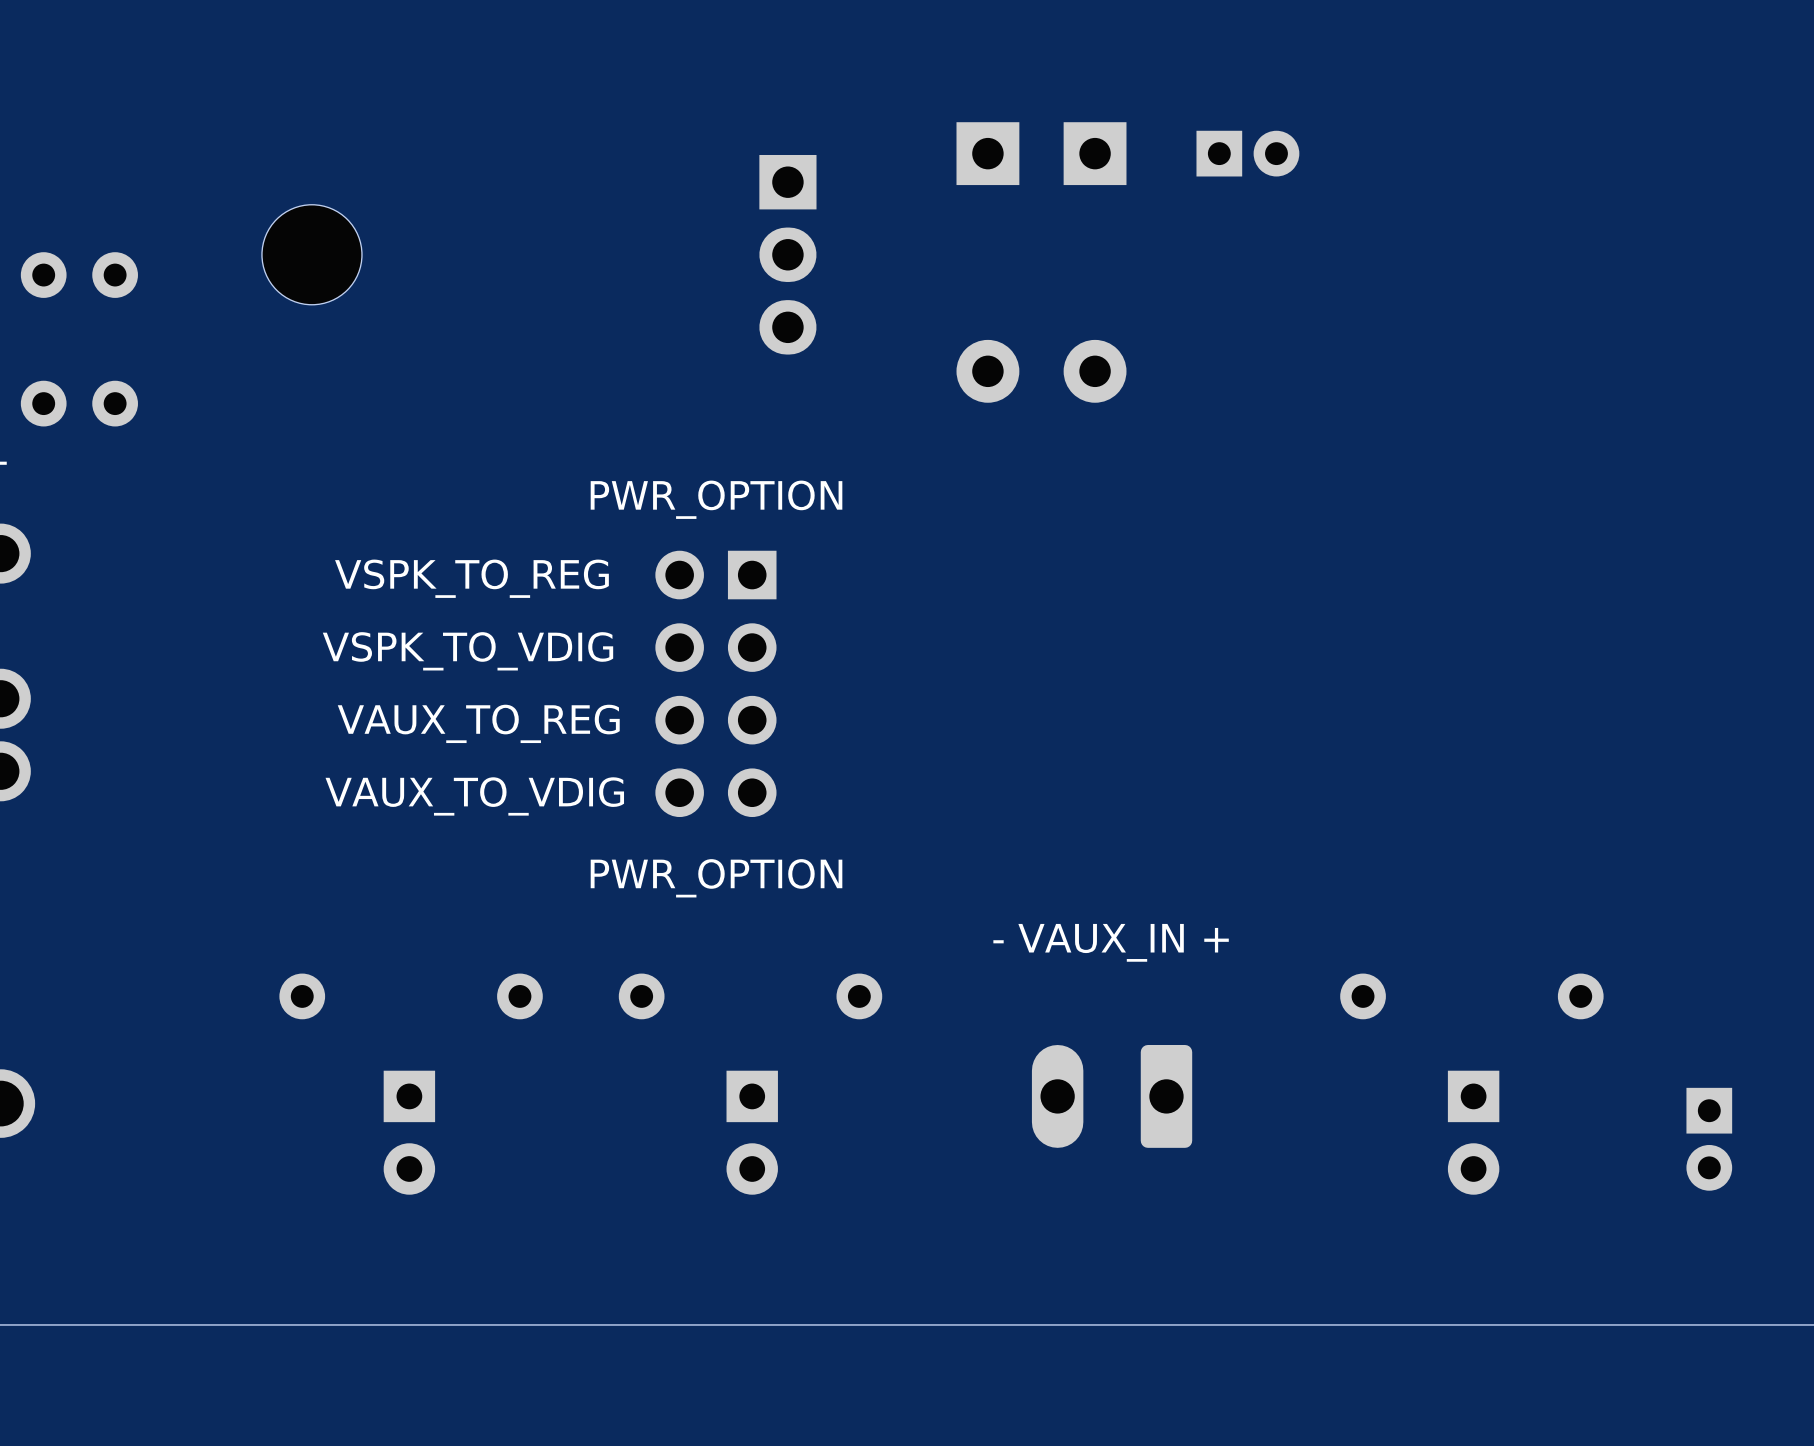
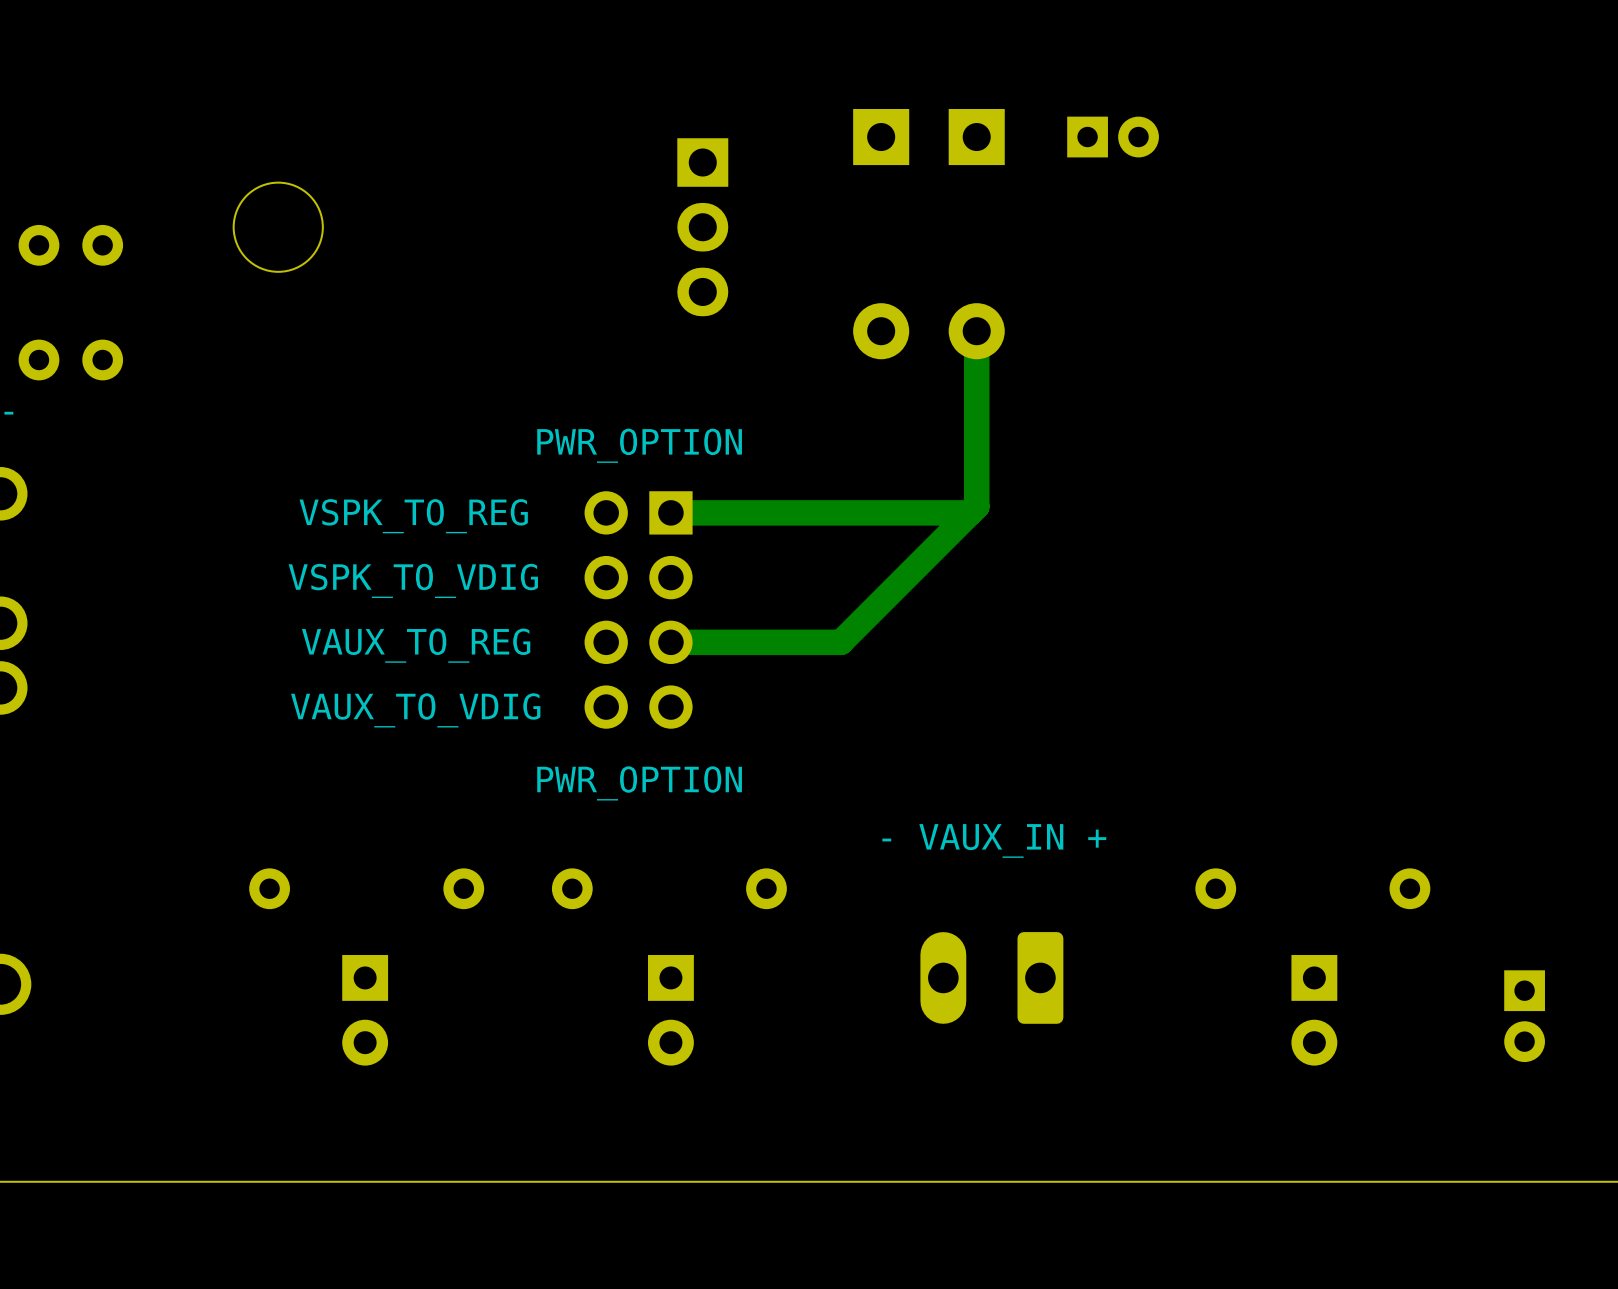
track: none -> (976, 331) (976, 506) (840, 642) (670, 642)
track: none -> (970, 512) (670, 512)

